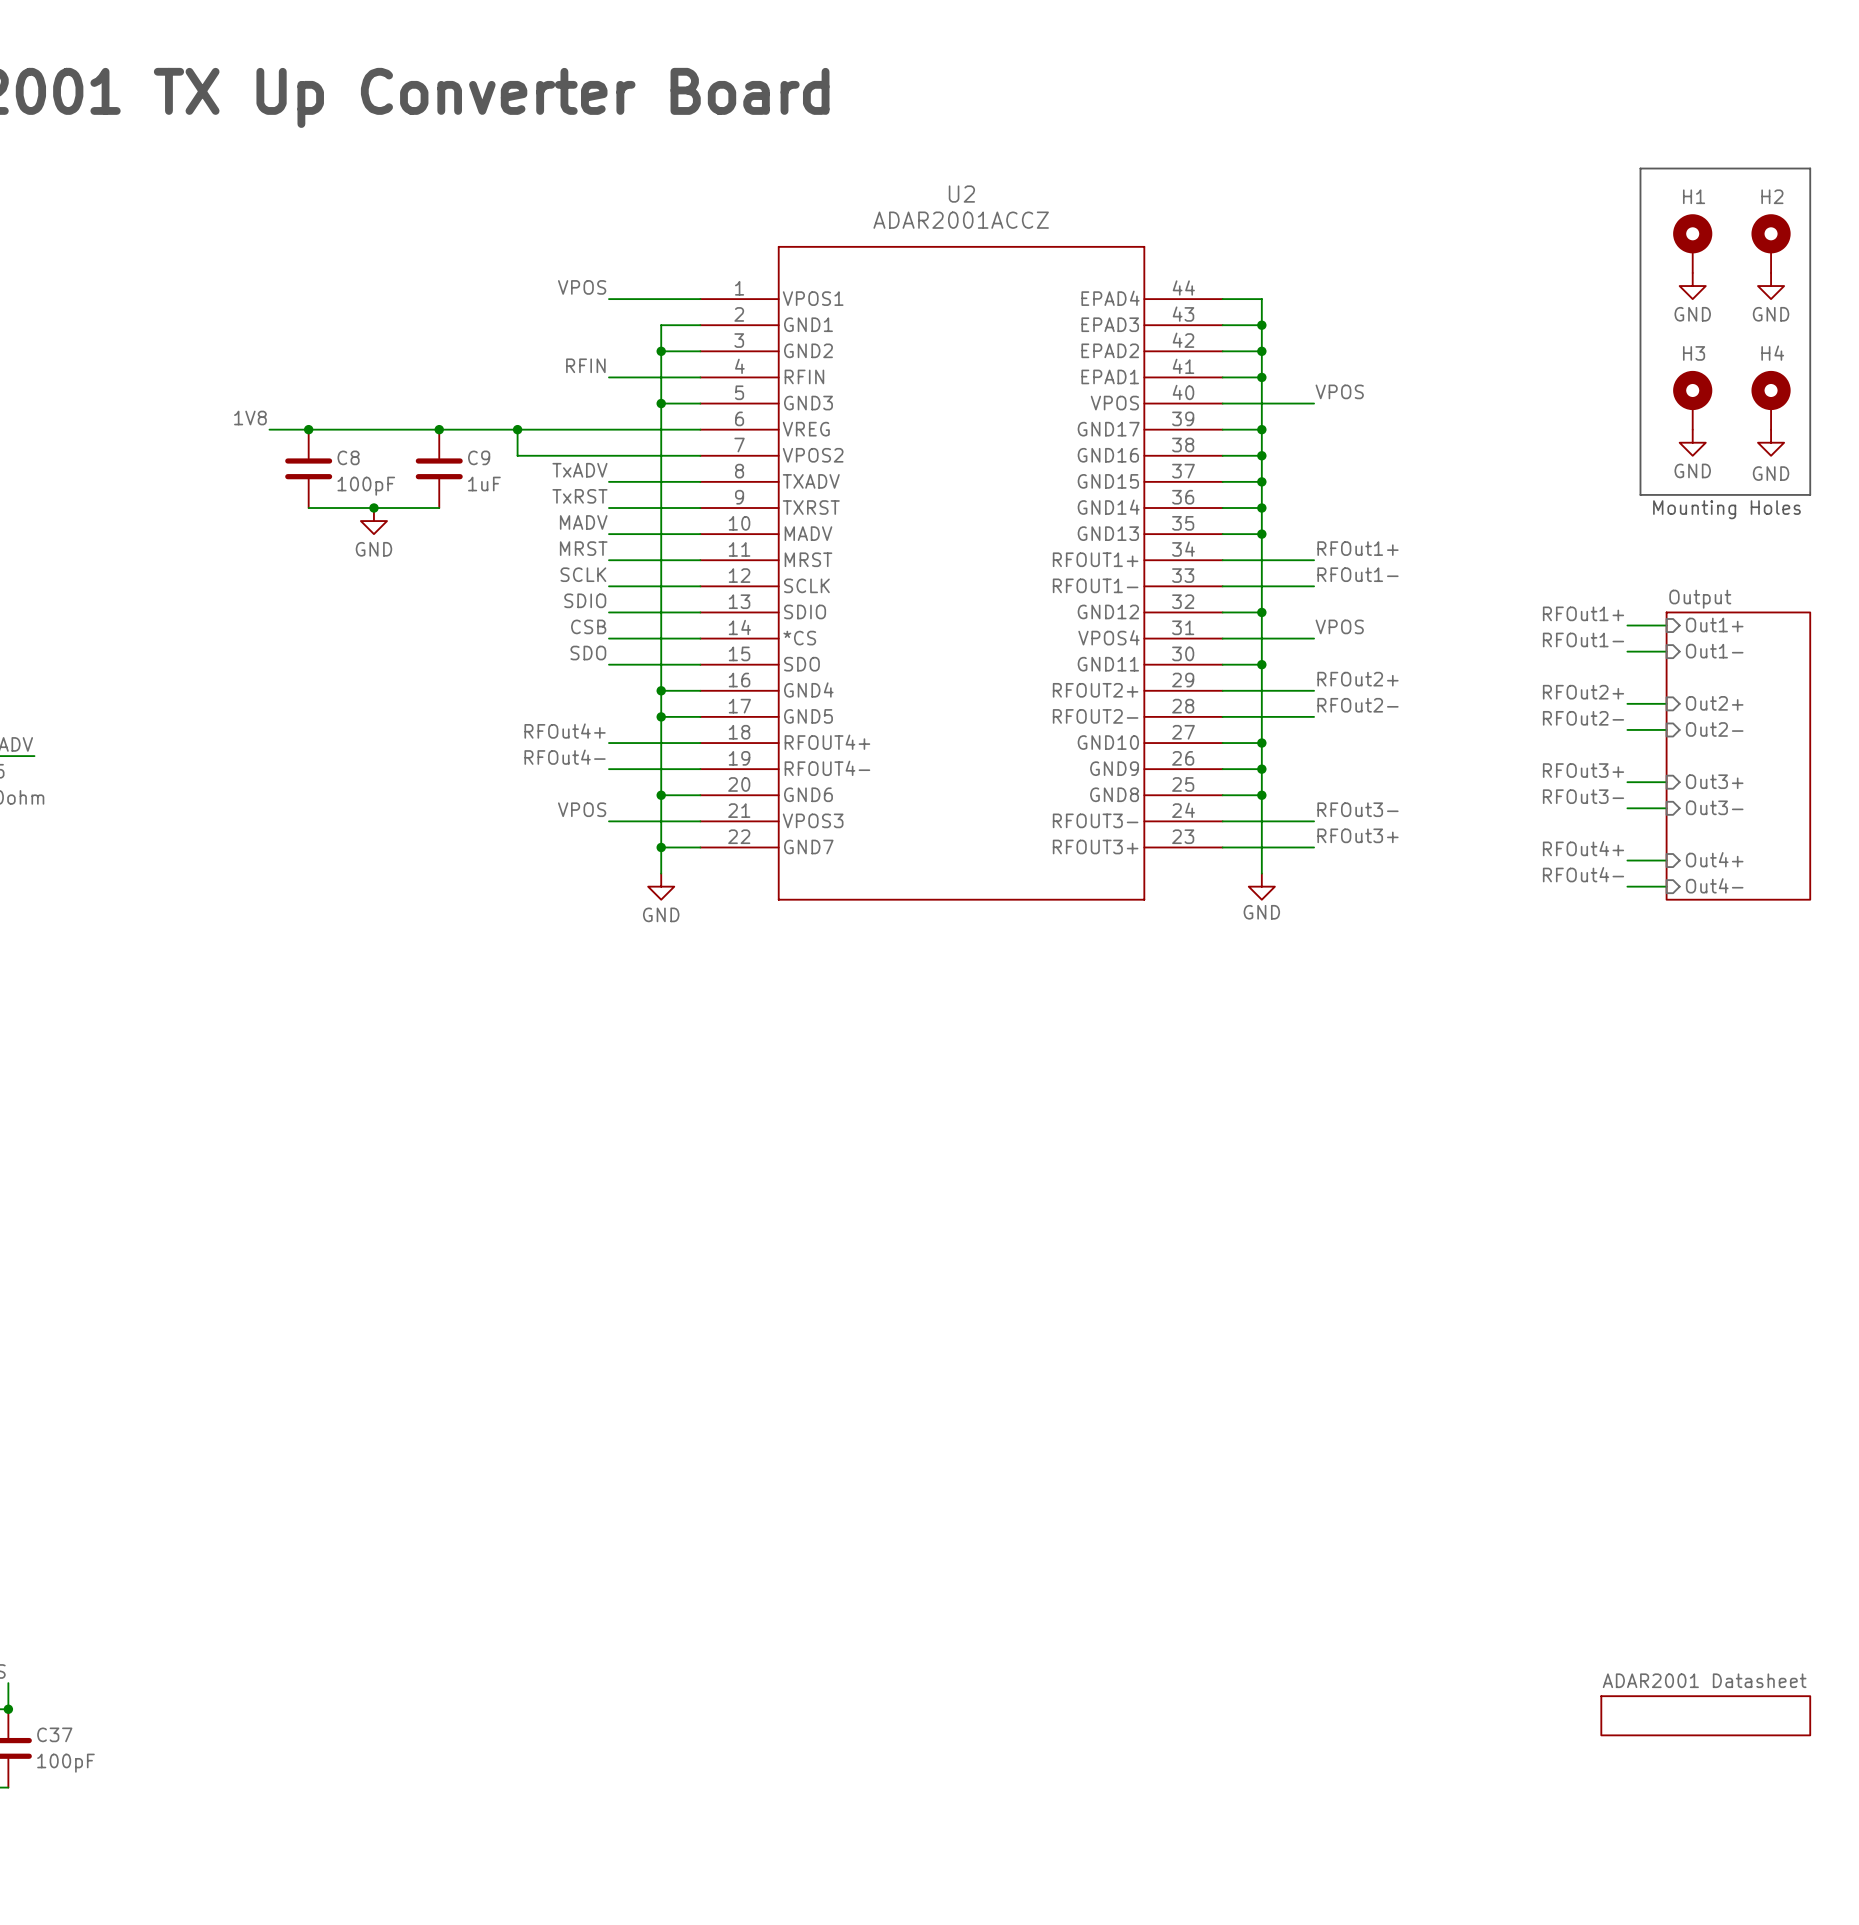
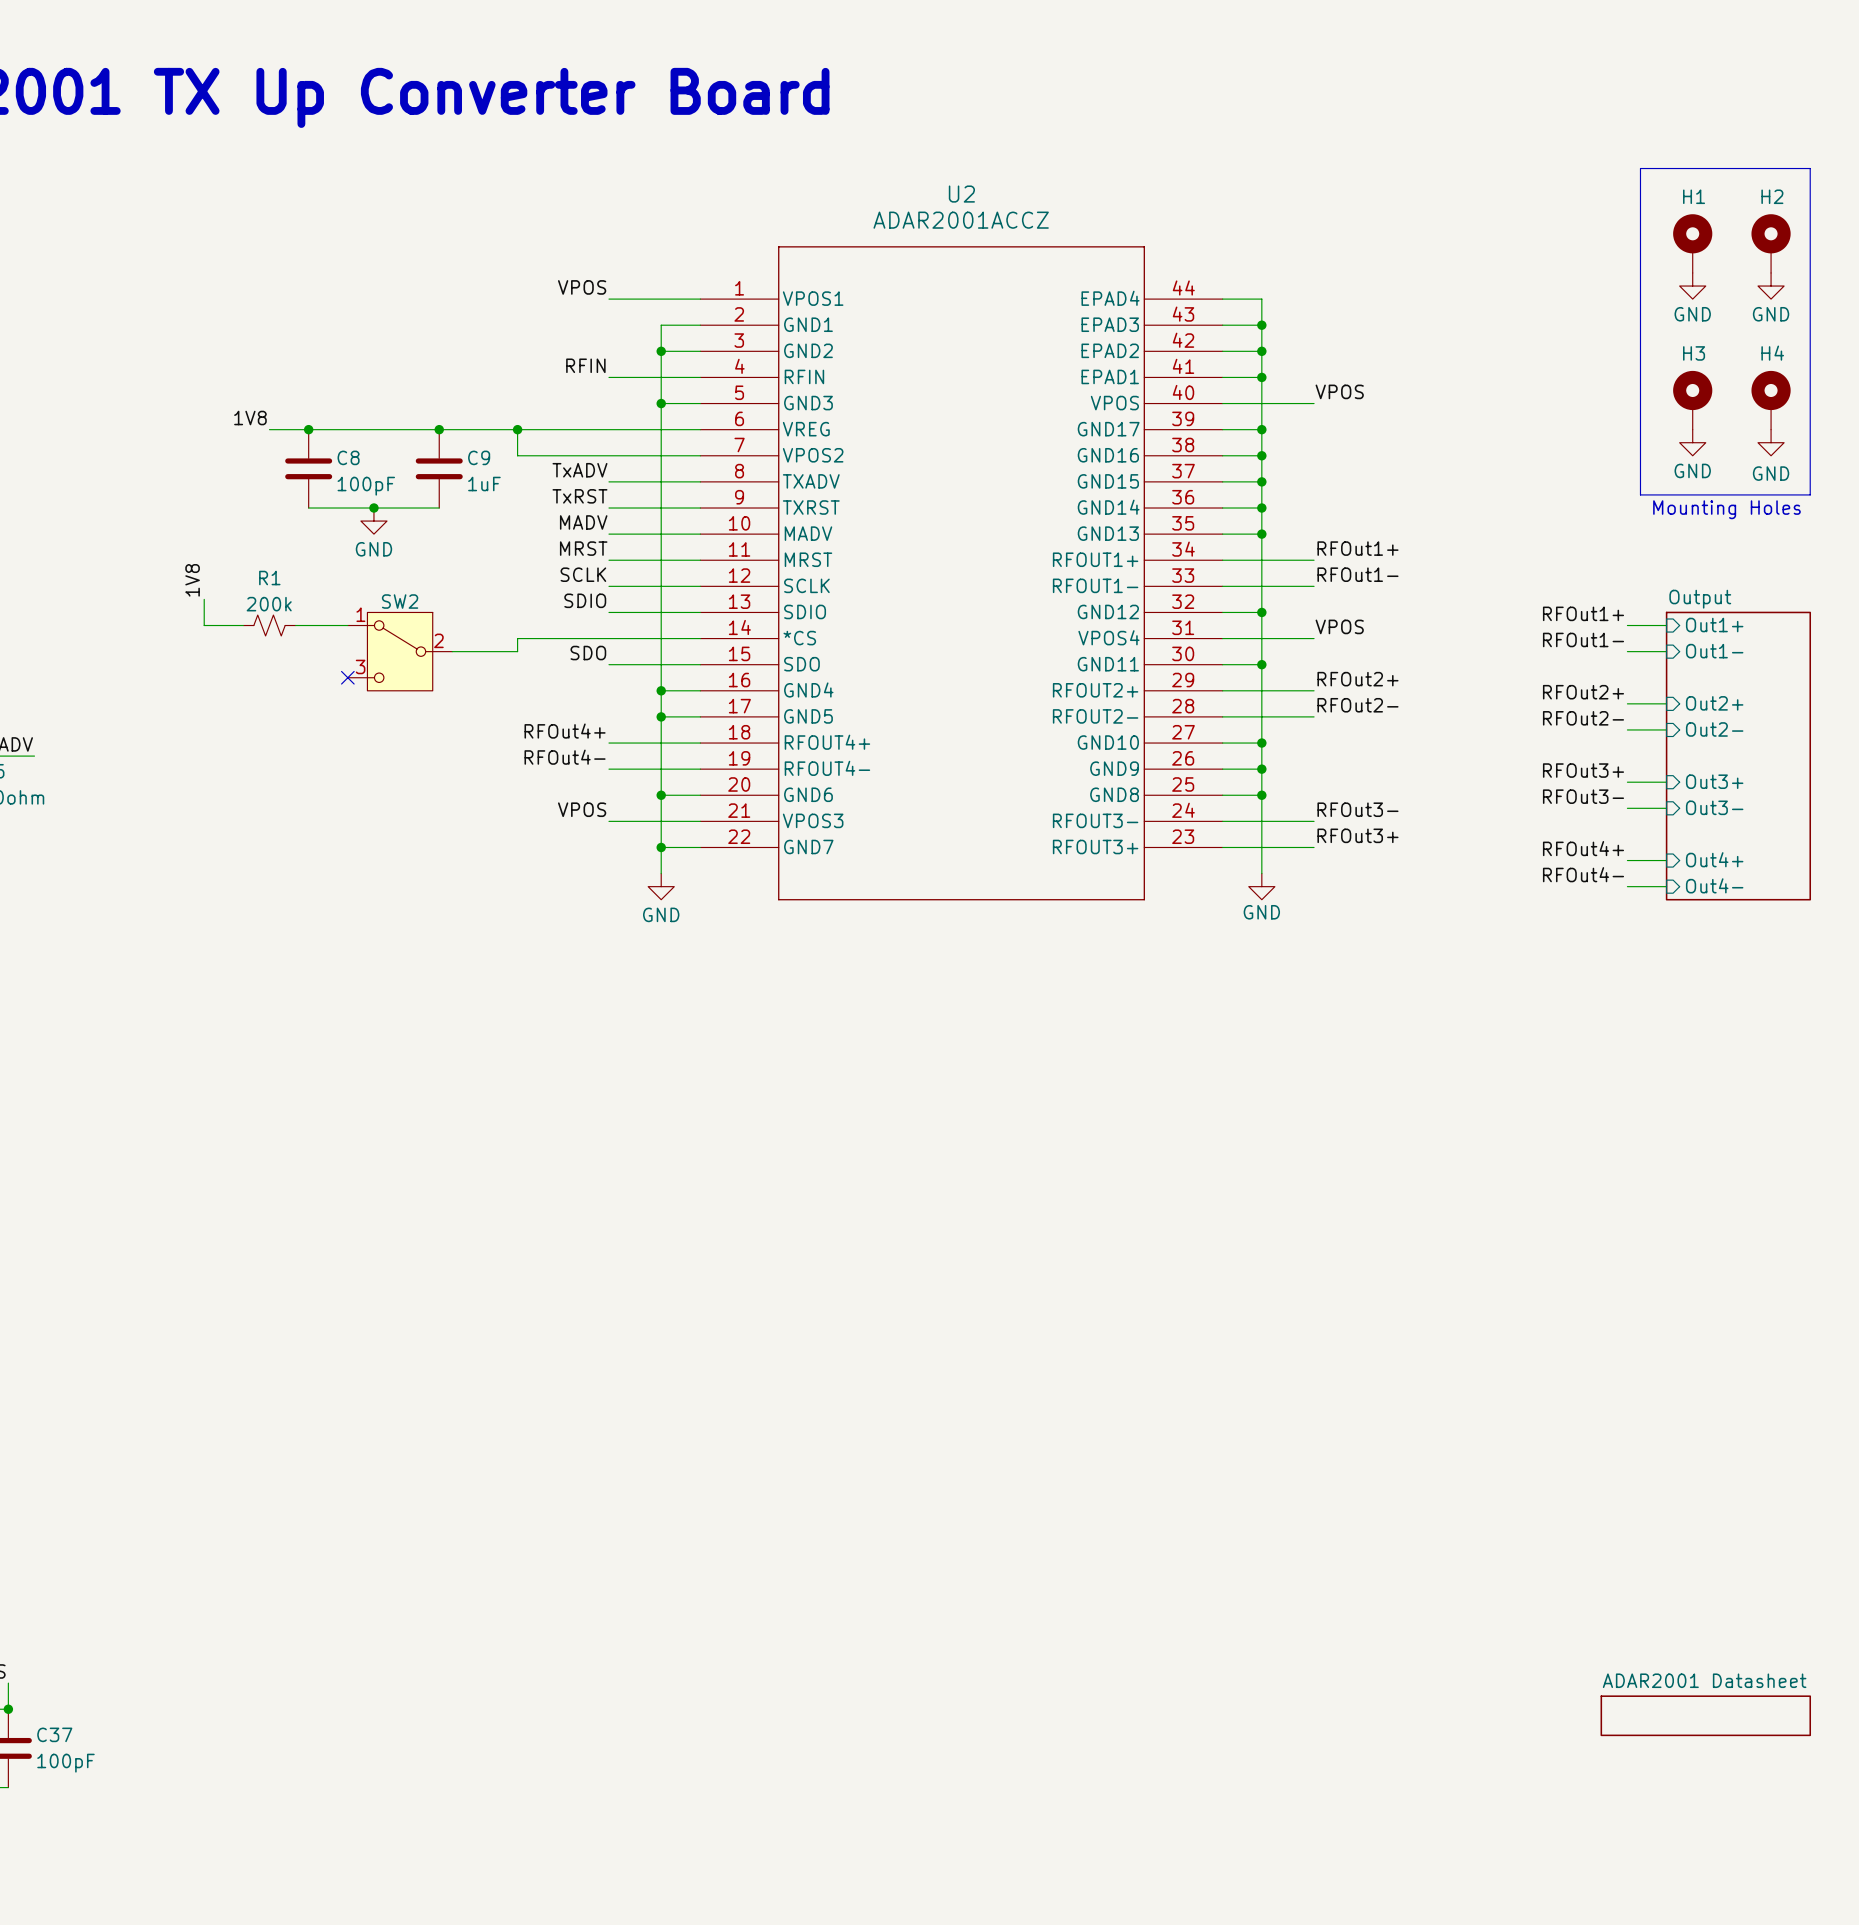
label: none -> 1V8 (192, 580)
wire: none -> (204, 599) (204, 625) (243, 625)
R1: none -> 200k (269, 625)
wire: none -> (295, 625) (347, 625)
label: CSB (588, 626) -> none
wire: none -> (608, 638) (517, 638) (517, 651) (452, 651)
SW2: none -> (400, 651)
no-connect mark: none -> (347, 677)

